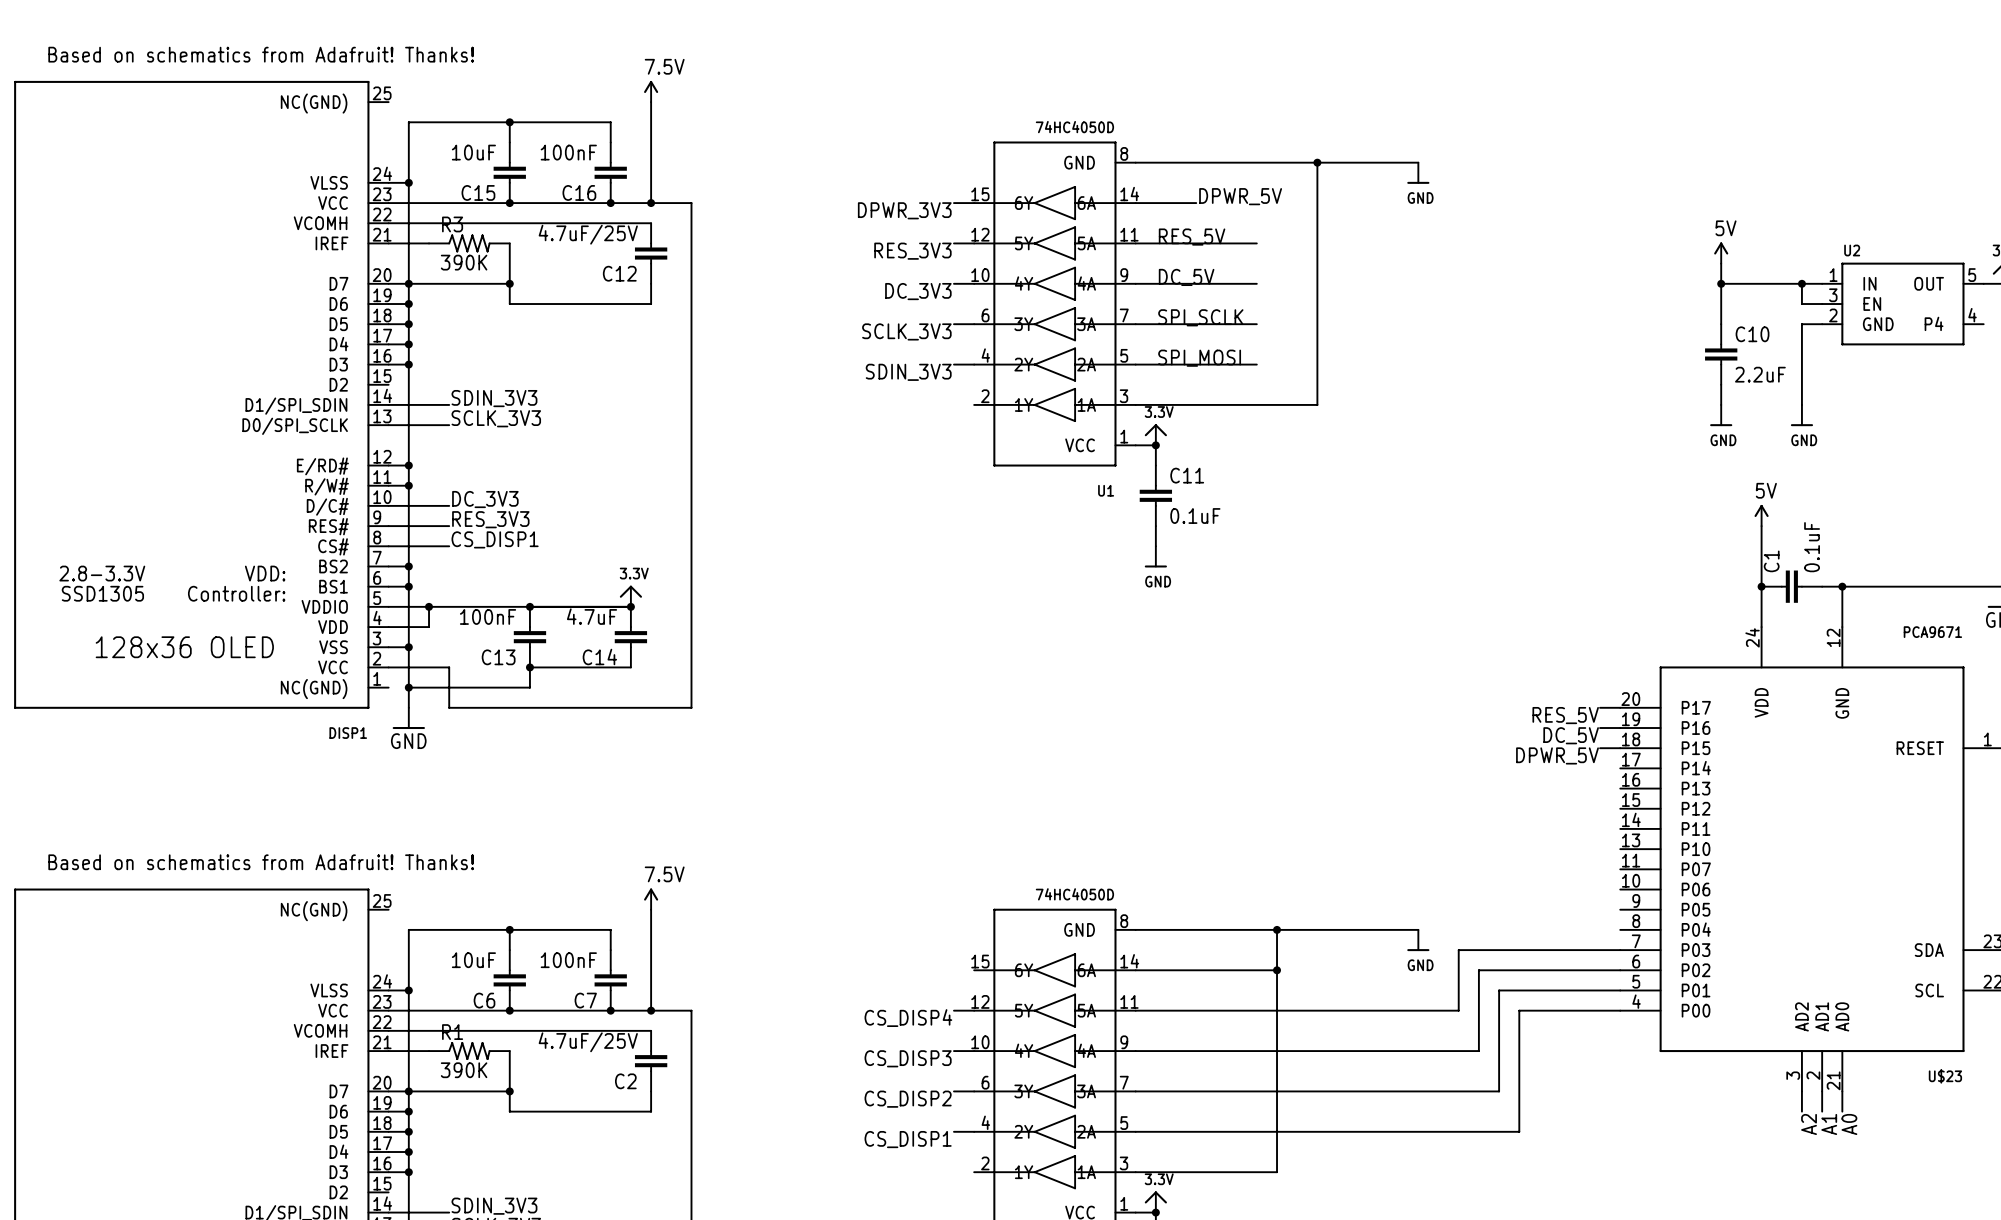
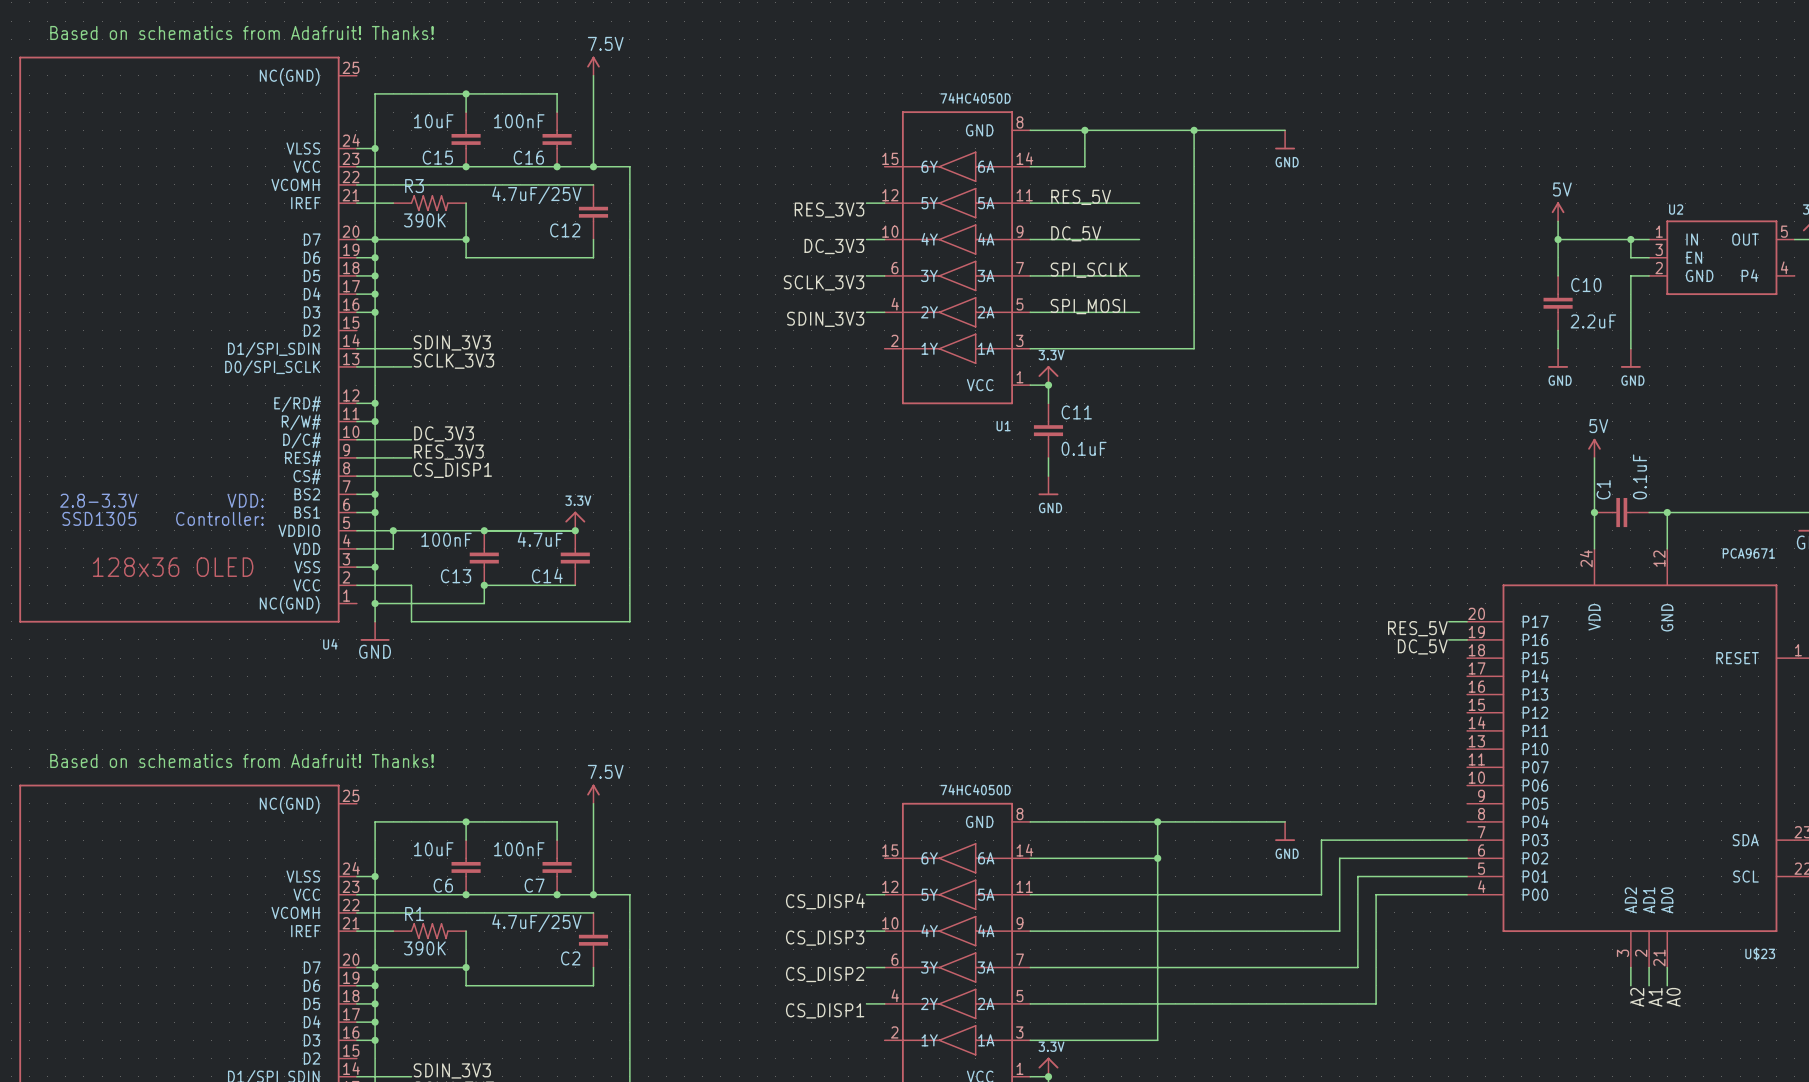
wire: none -> (1084, 130) (1084, 166)
junction: none -> (1084, 130)
label: DPWR_5V (1240, 196) -> none
wire: (953, 203) (974, 203) -> none
label: DPWR_3V3 (904, 210) -> none
DISP1 name: DISP1 (348, 733) -> U4 (330, 644)
wire: (1600, 748) (1620, 748) -> none
label: DPWR_5V (1557, 755) -> none

